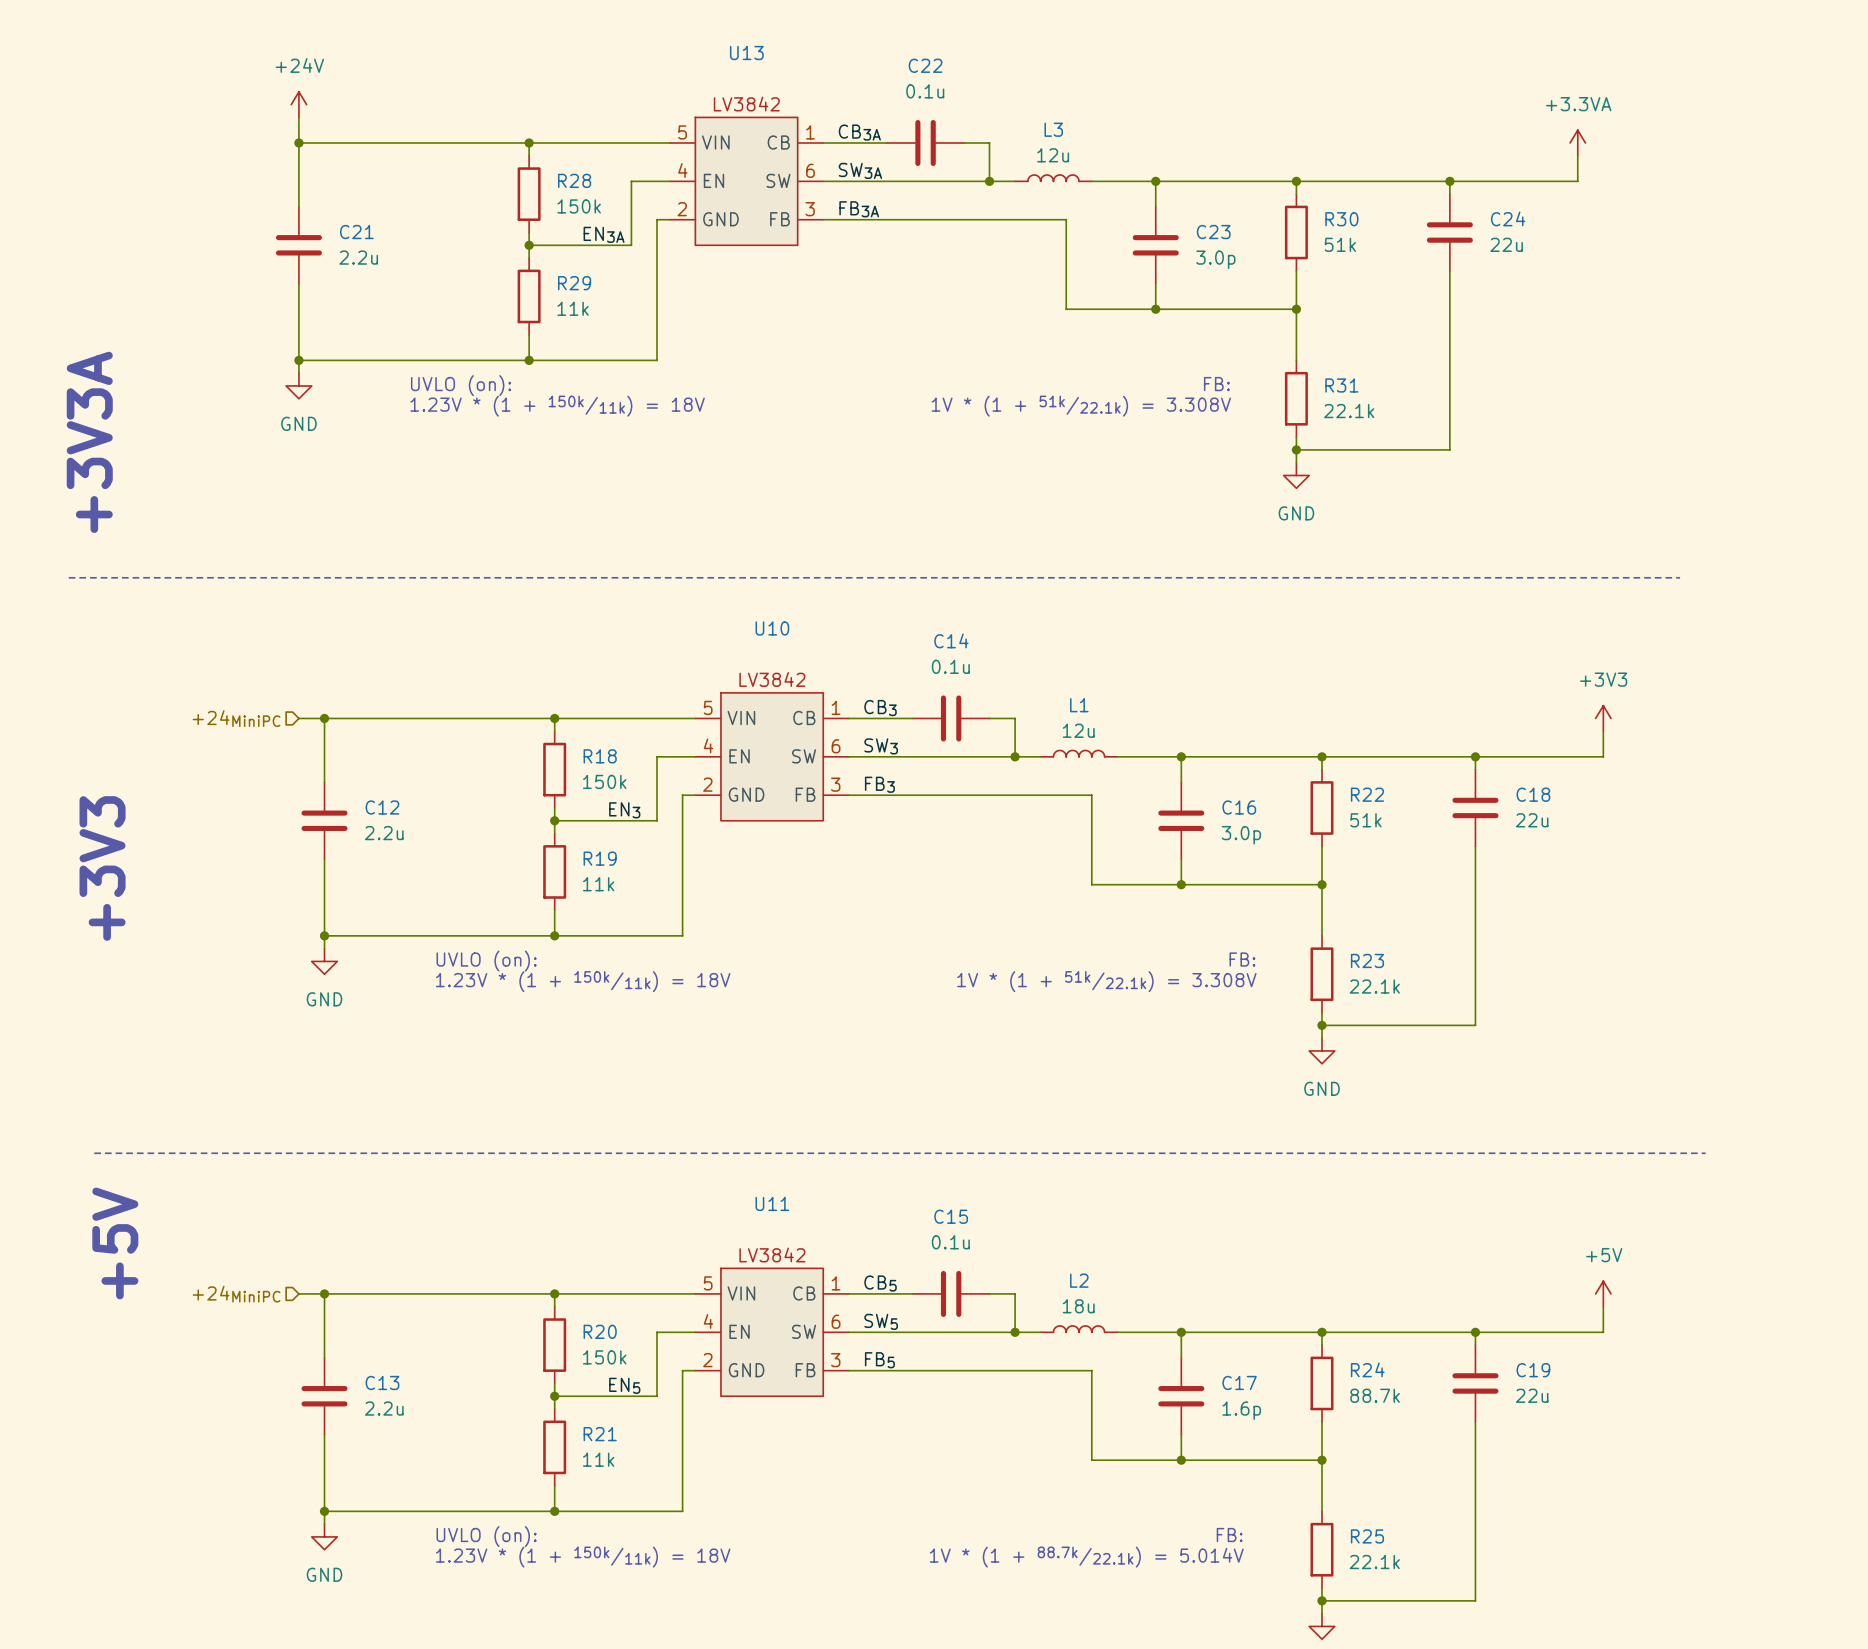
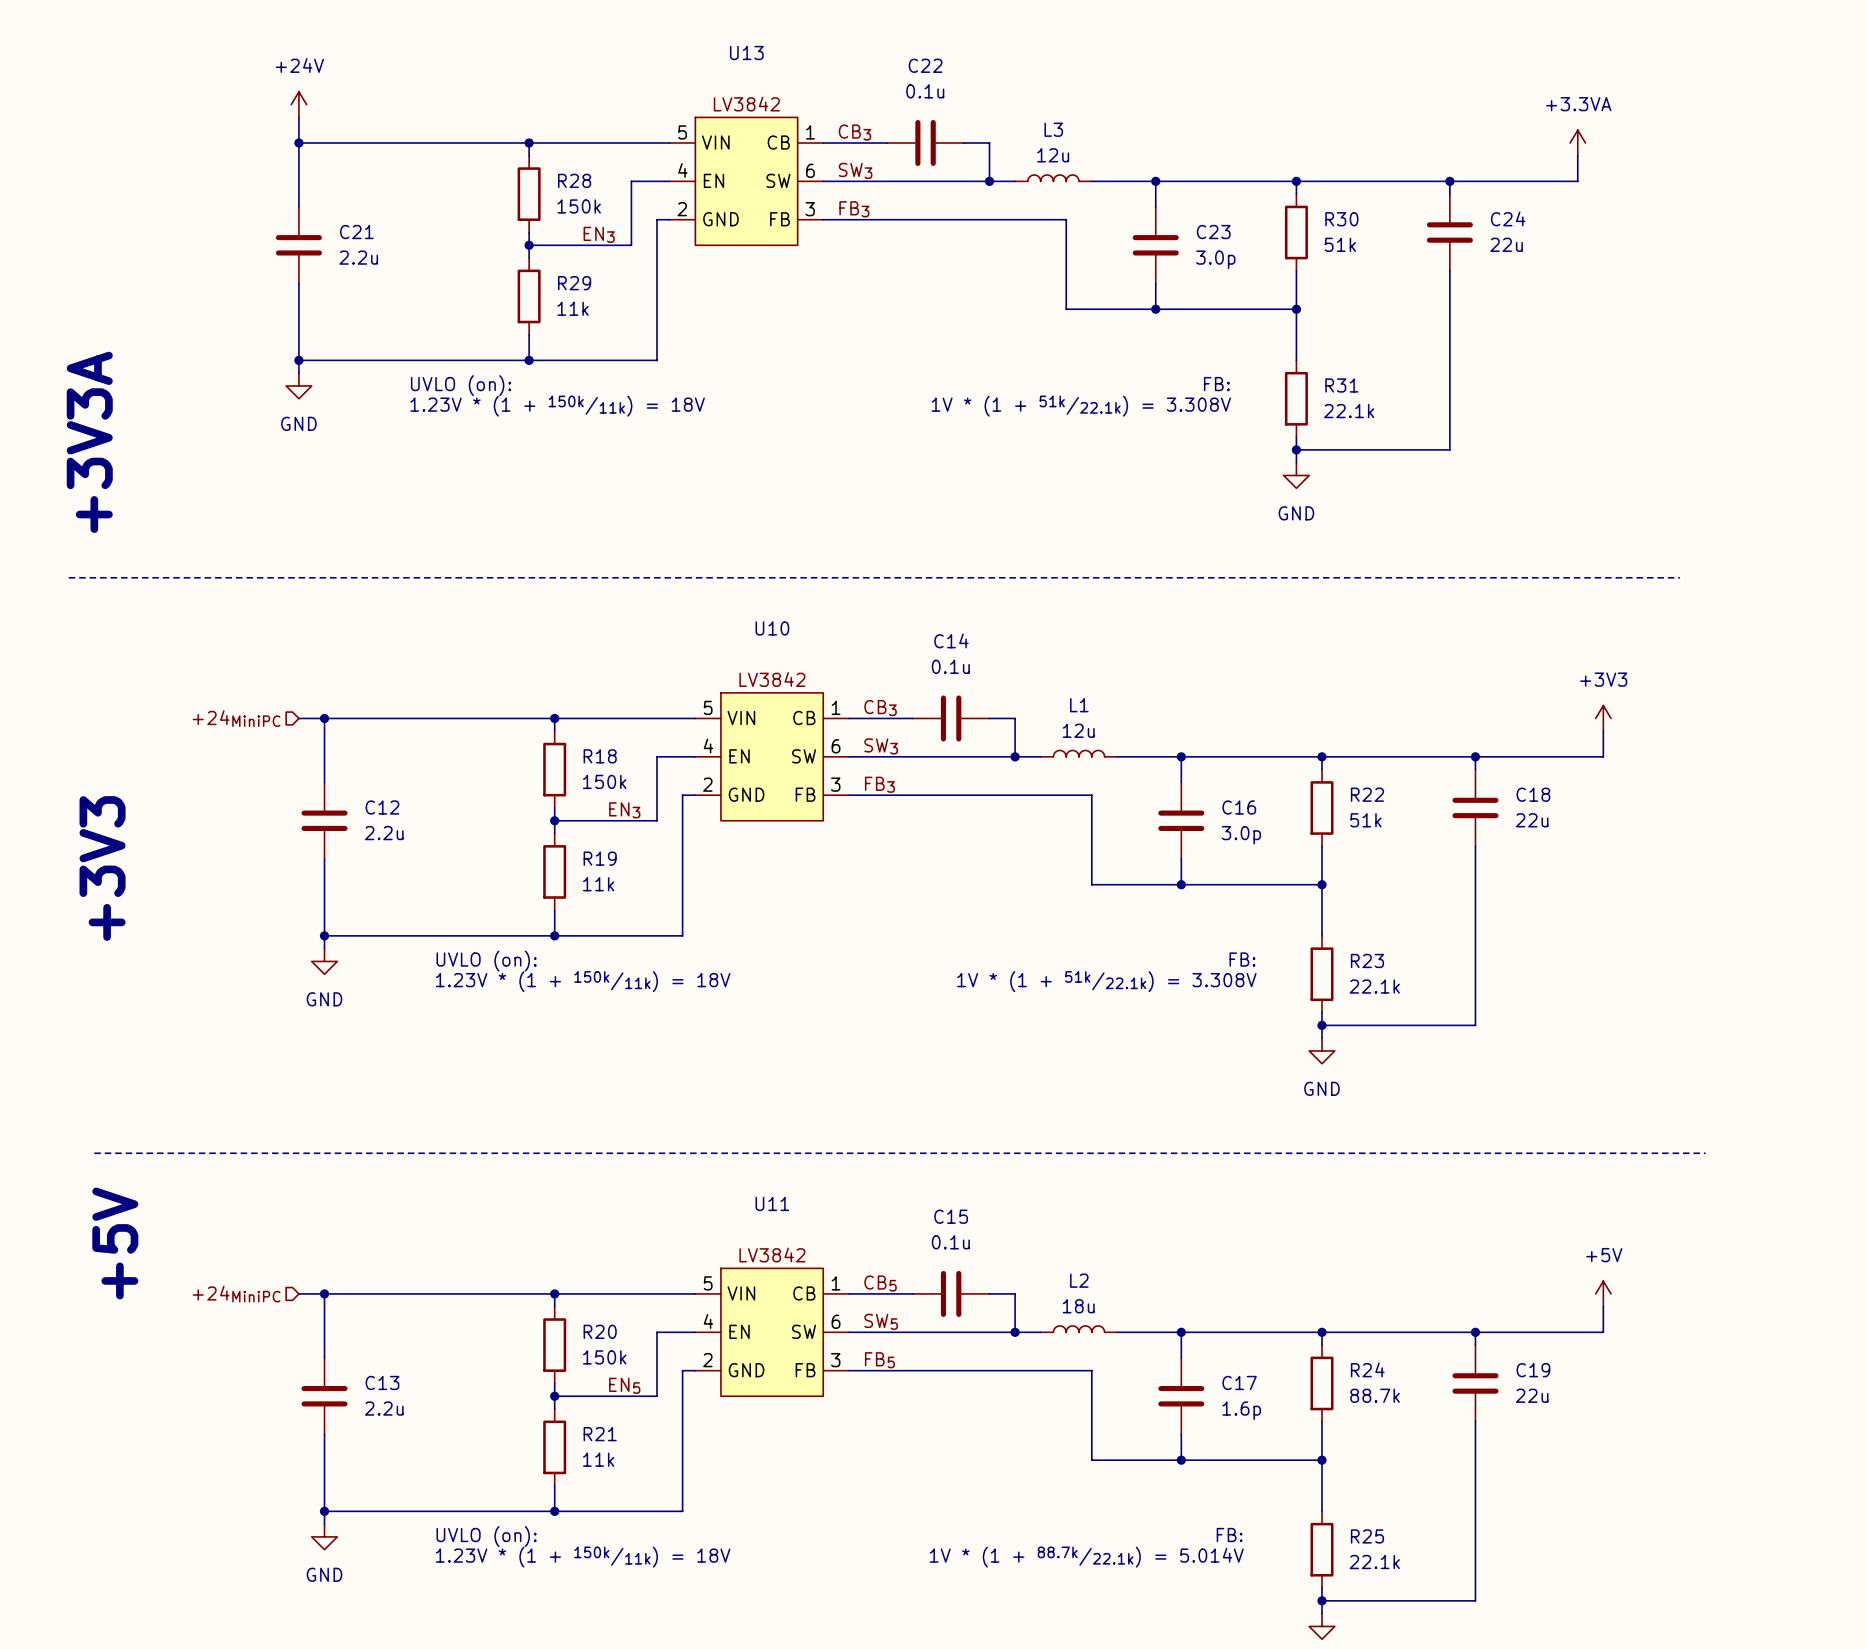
label: CB3A (859, 132) -> CB3 (854, 132)
label: SW3A (860, 170) -> SW3 (855, 170)
label: FB3A (859, 209) -> FB3 (854, 209)
label: EN3A (604, 234) -> EN3 (599, 234)

